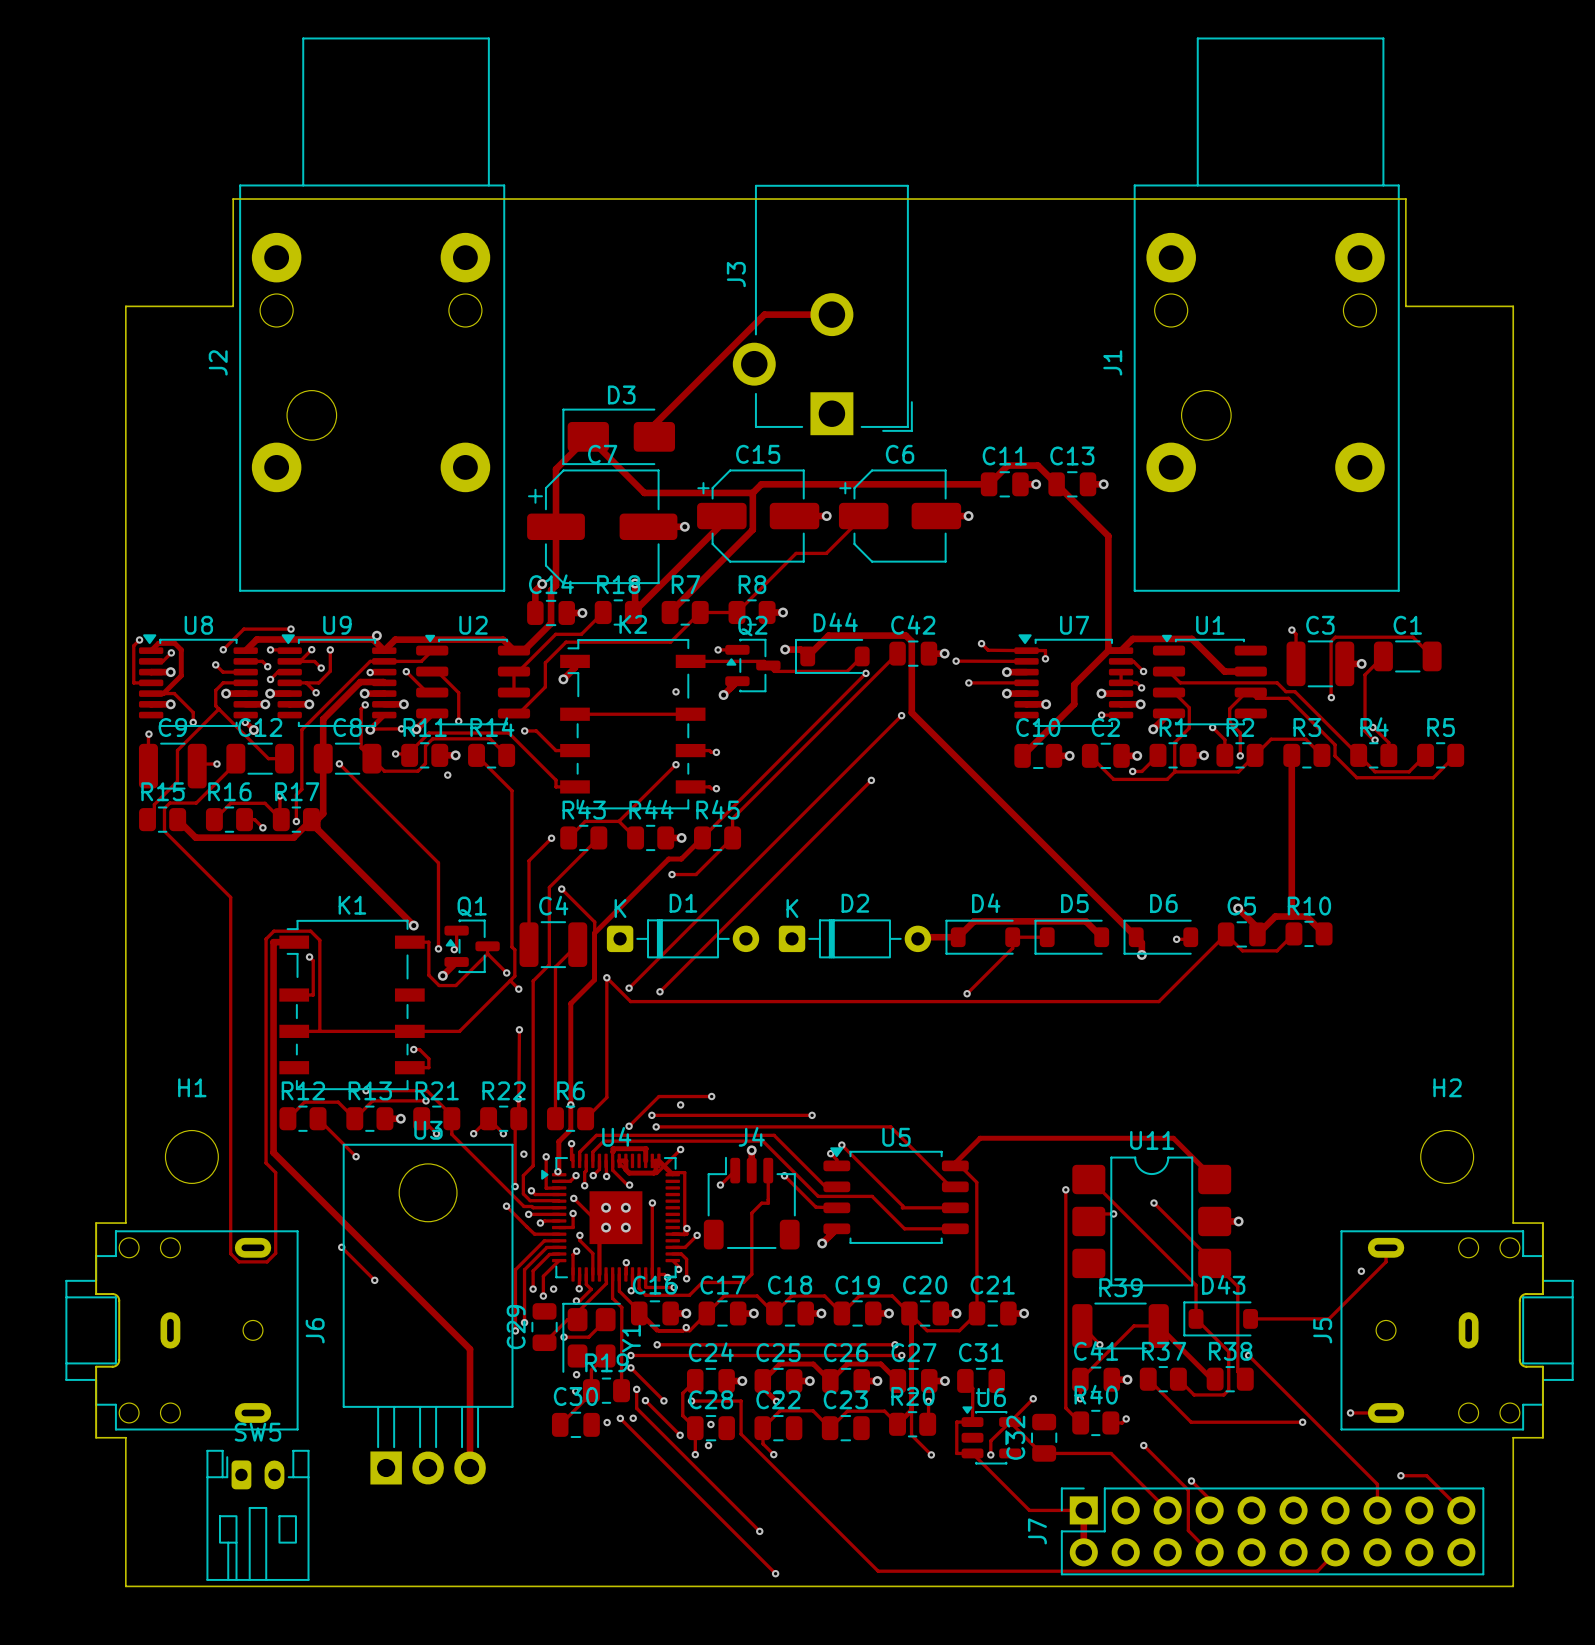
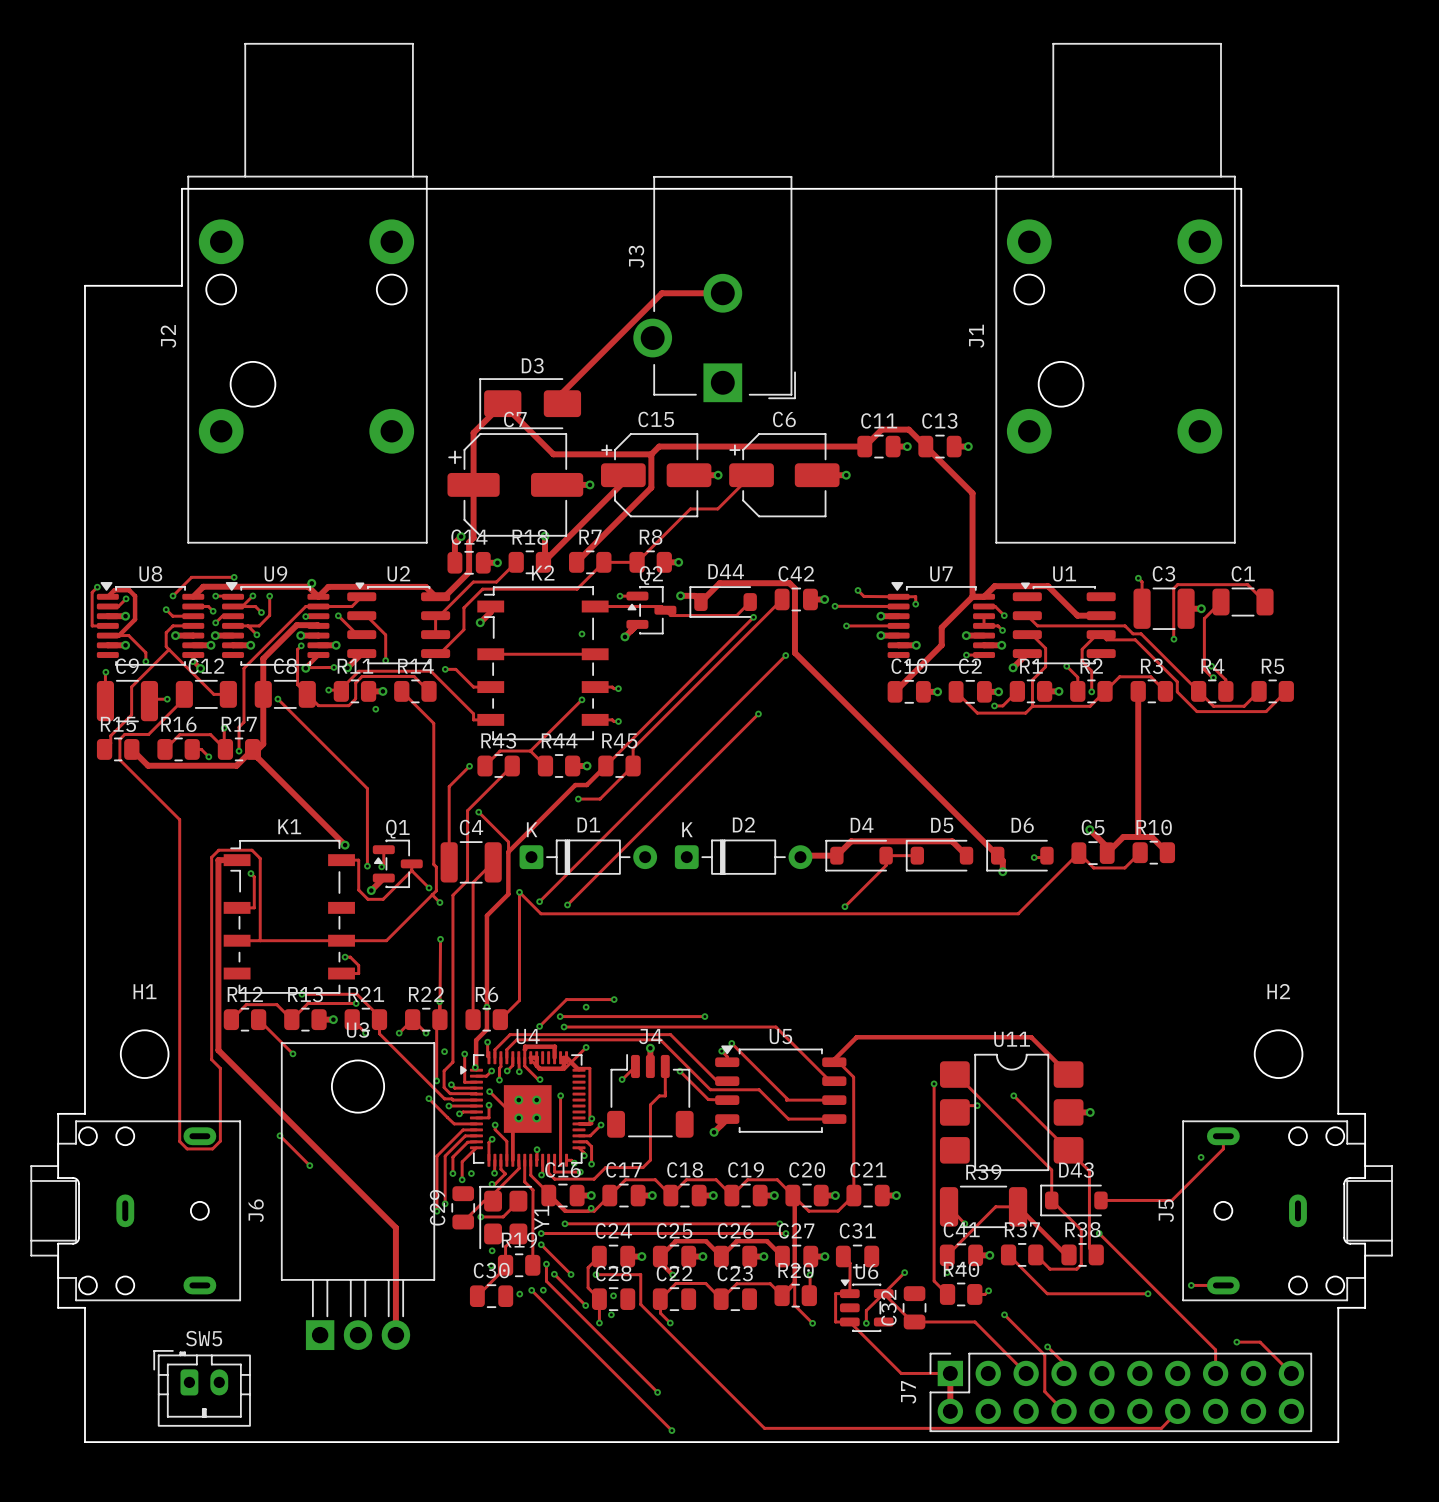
SW5 footprint: [206, 1449, 310, 1581] -> [153, 1350, 251, 1427]

